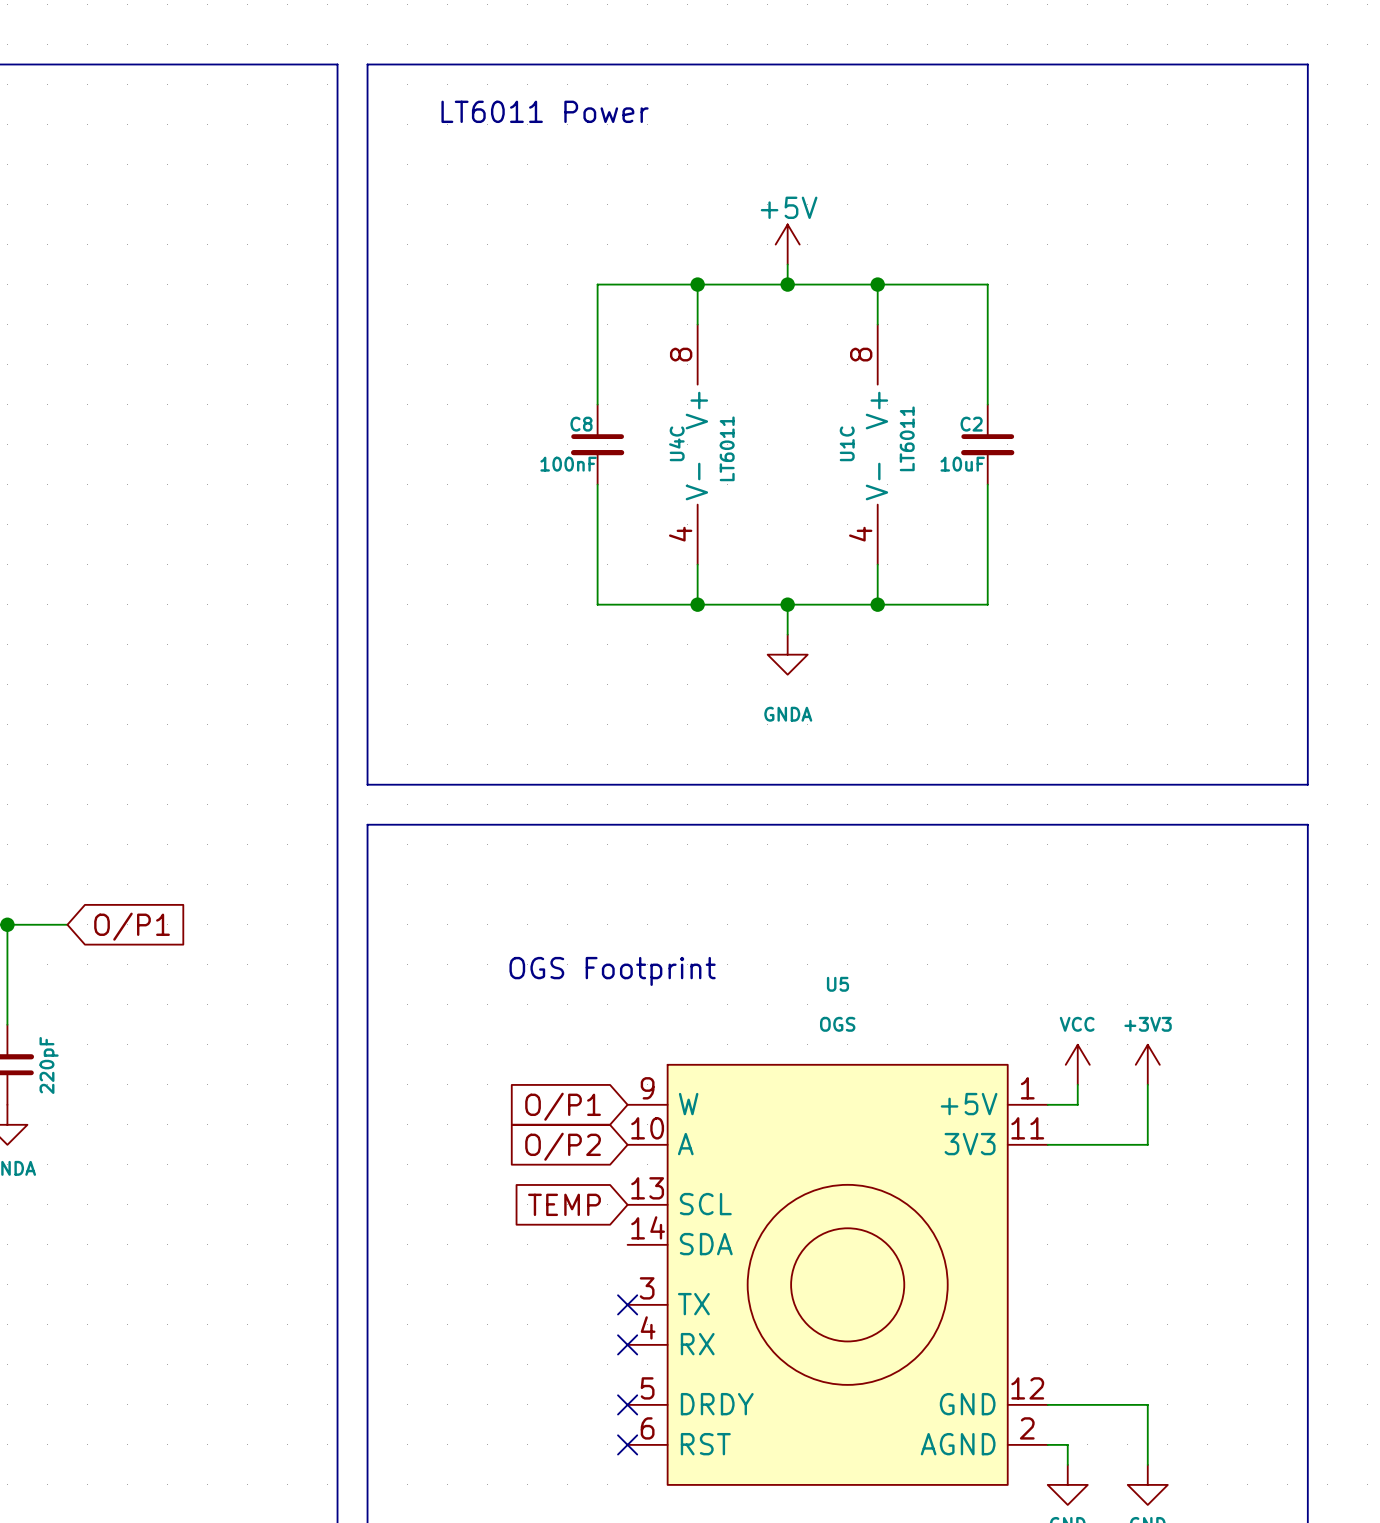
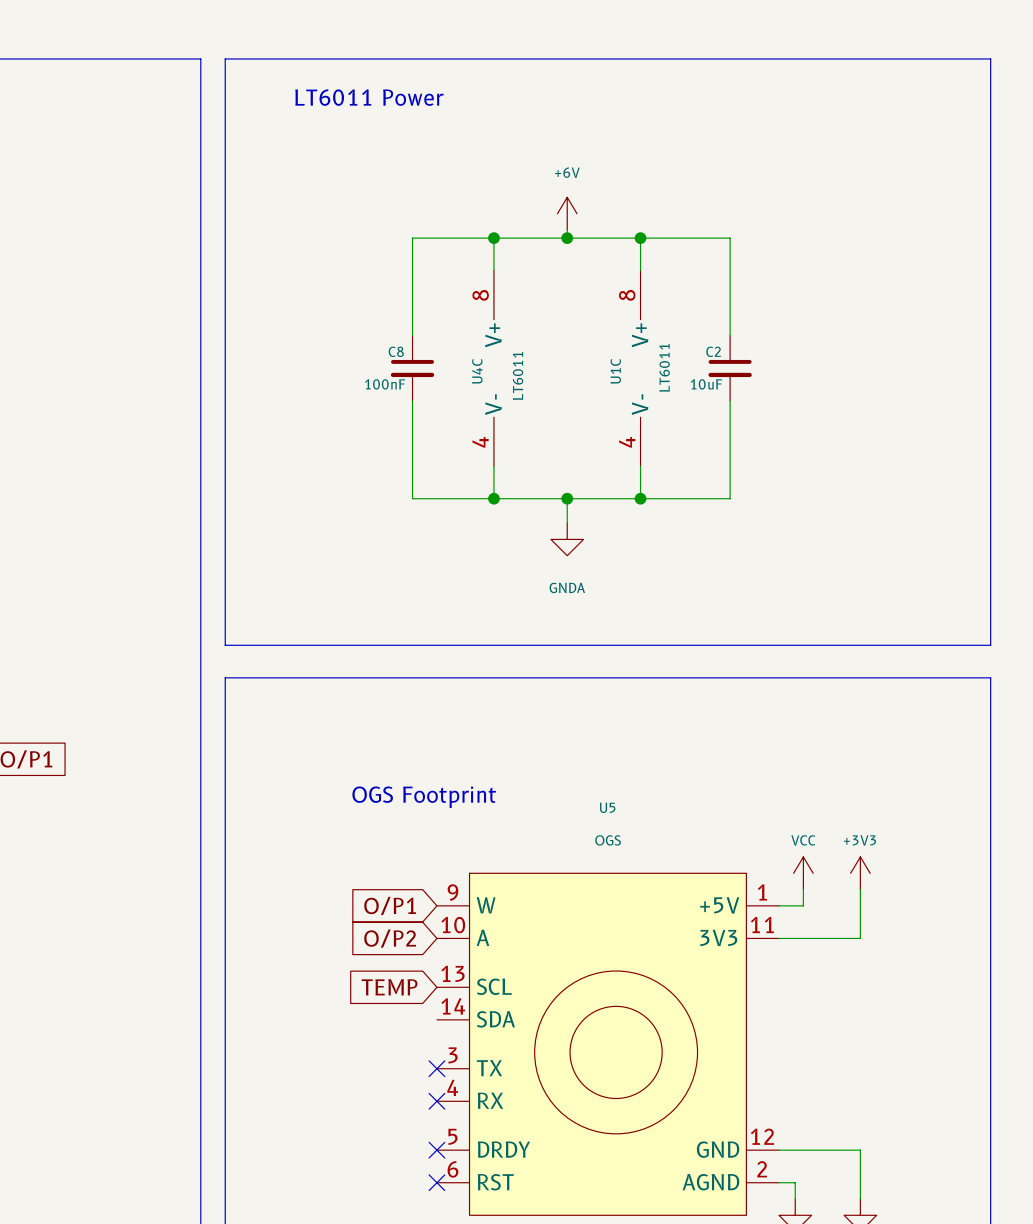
power symbol: +5V (787, 244) -> +6V (567, 213)

